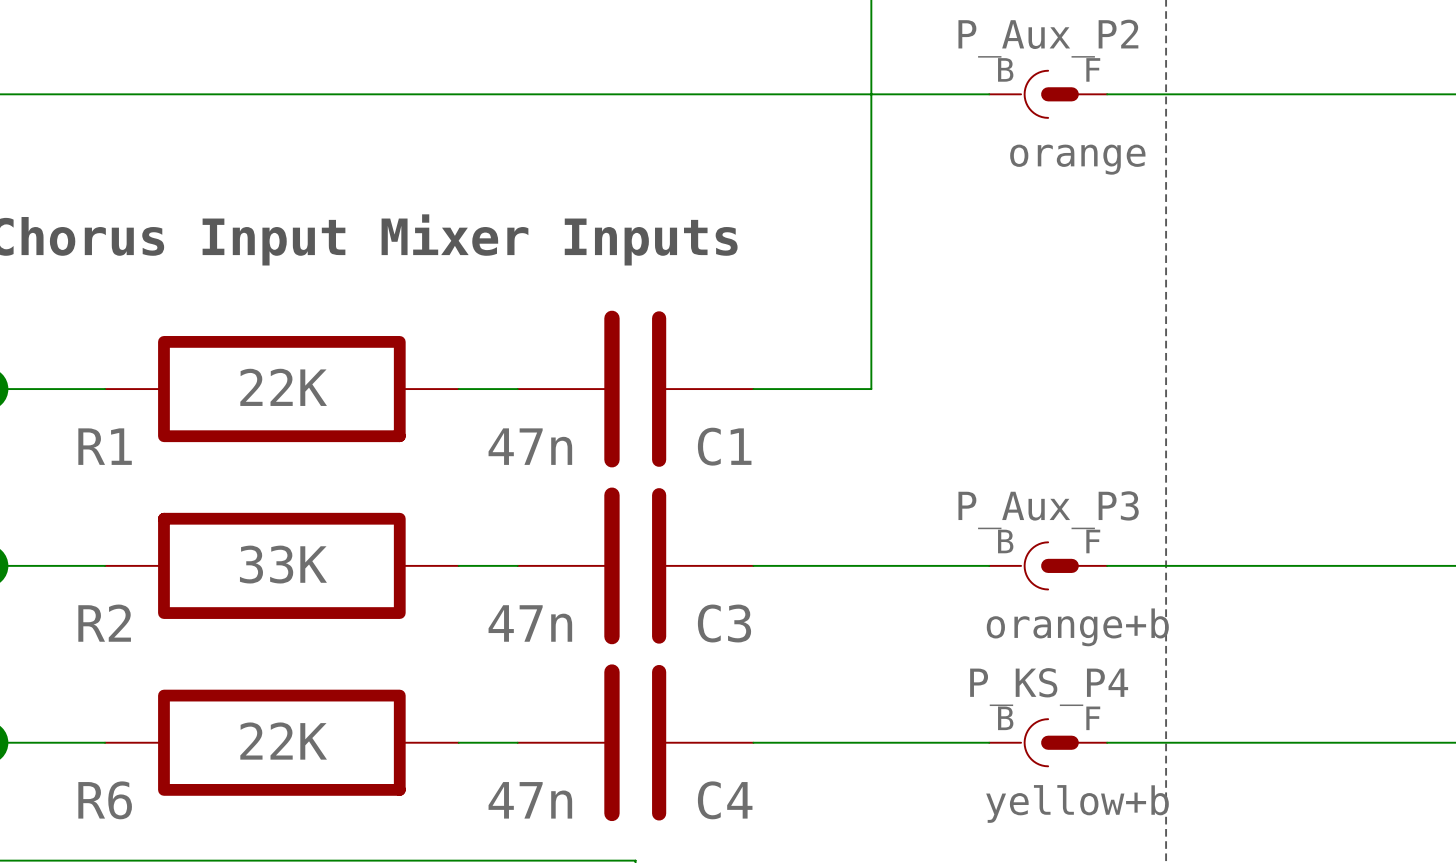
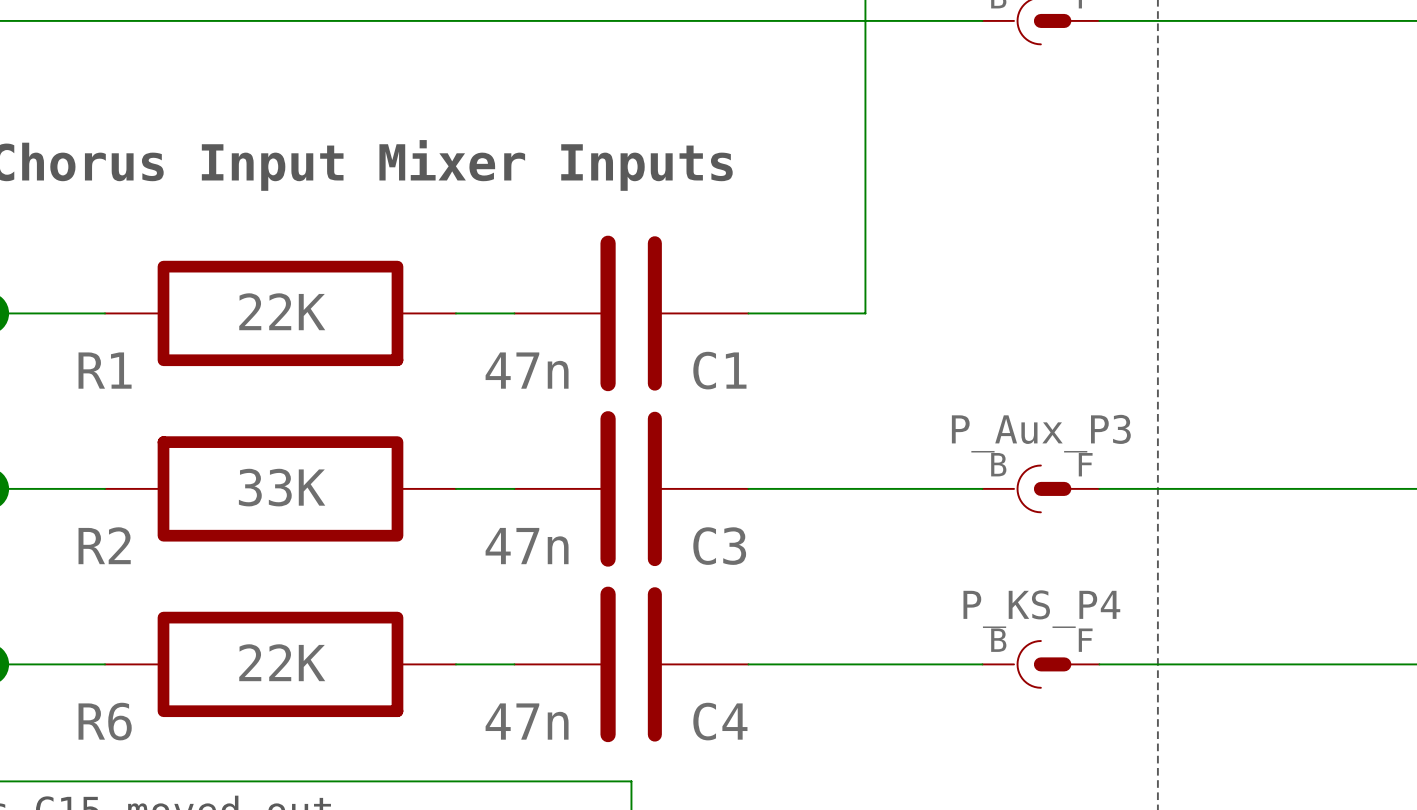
P_Aux_P2 value: orange (1077, 159) -> none
P_Aux_P3 value: orange+b (1077, 627) -> none
P_KS_P4 value: yellow+b (1077, 803) -> none

